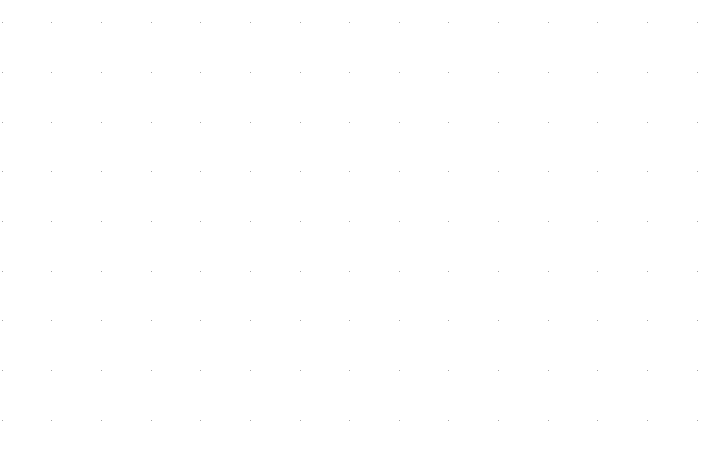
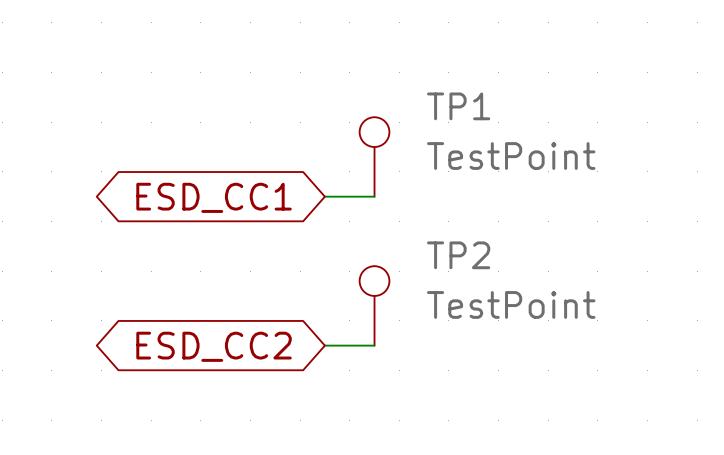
TP1: none -> TestPoint (374, 156)
wire: none -> (324, 196) (374, 196)
global label: none -> ESD_CC1 (214, 197)
TP2: none -> TestPoint (374, 305)
wire: none -> (324, 345) (374, 345)
global label: none -> ESD_CC2 (214, 346)

